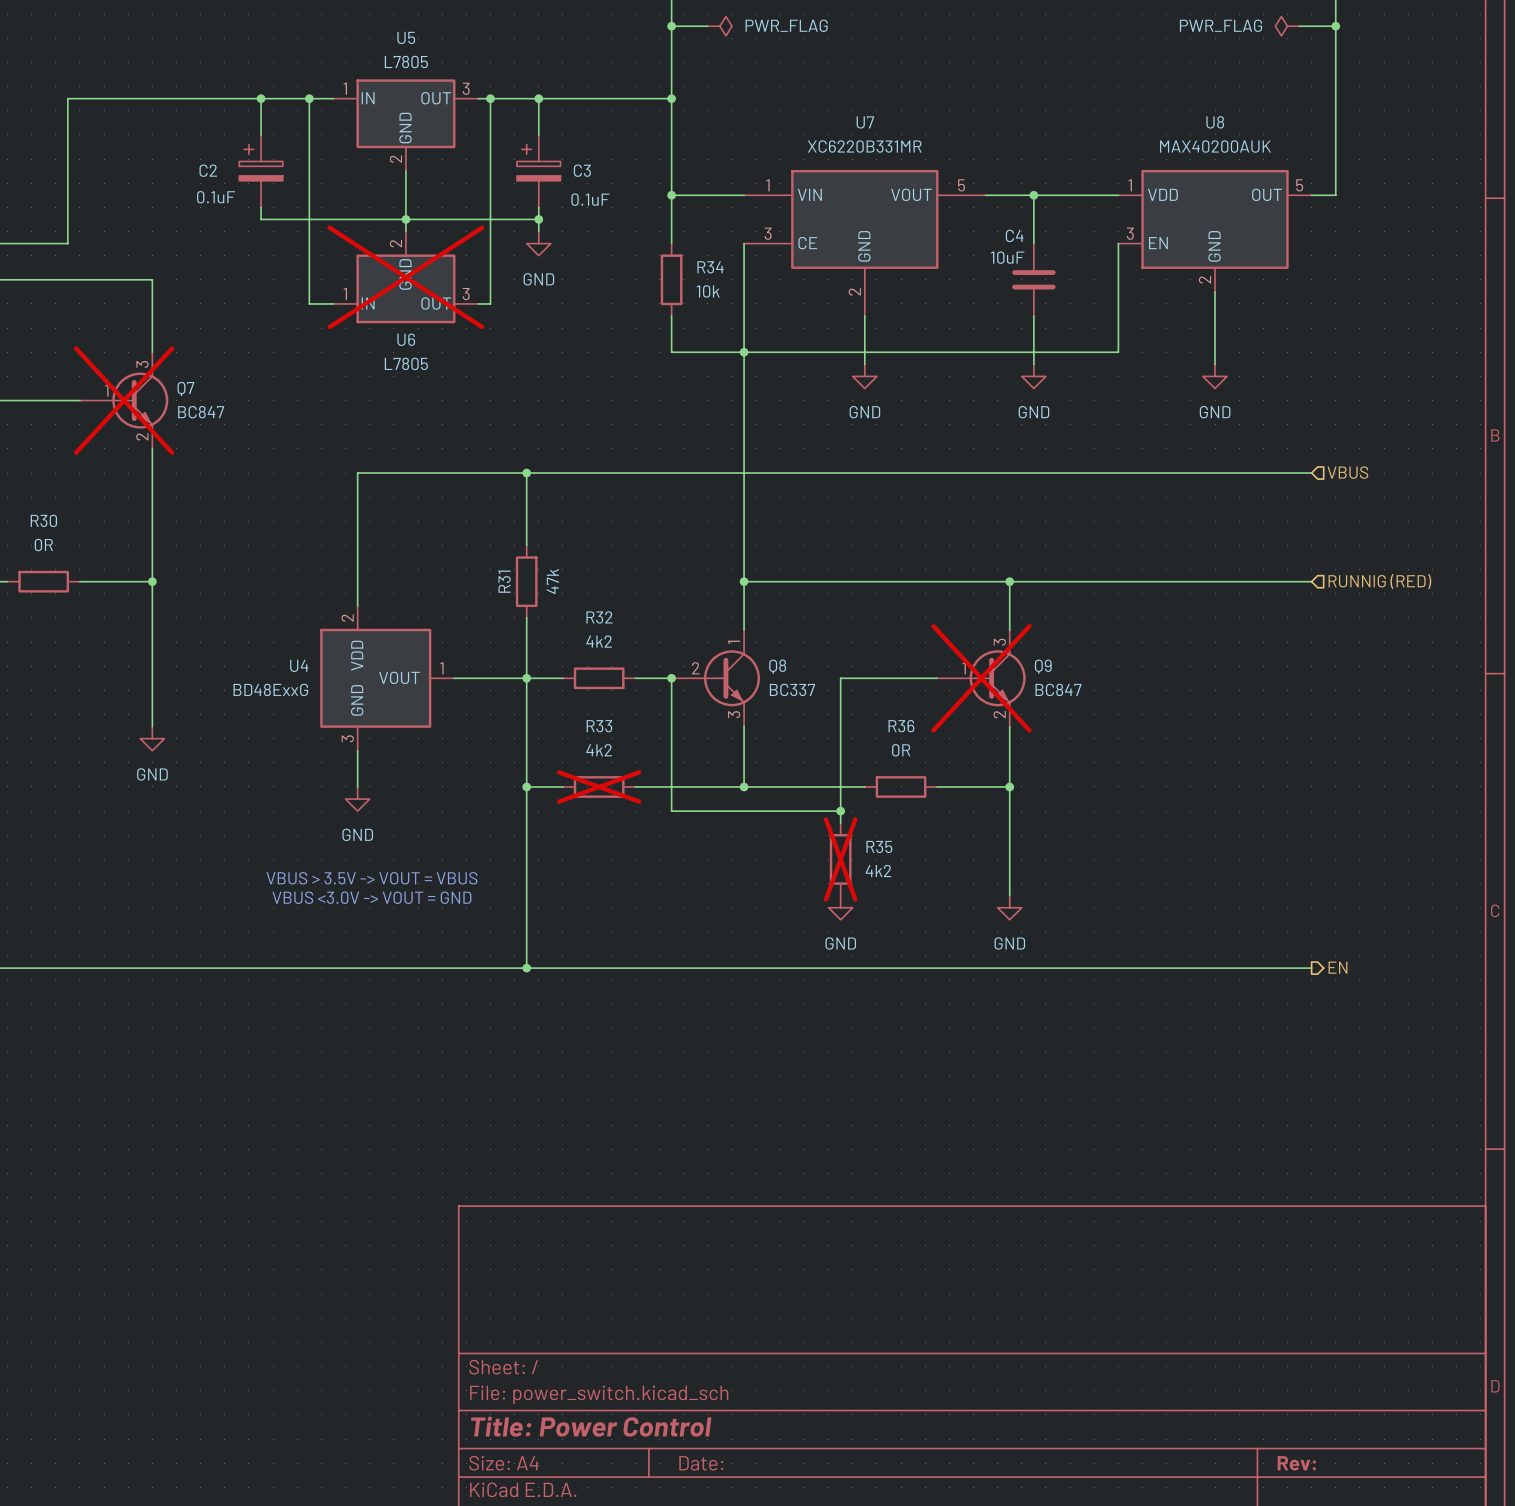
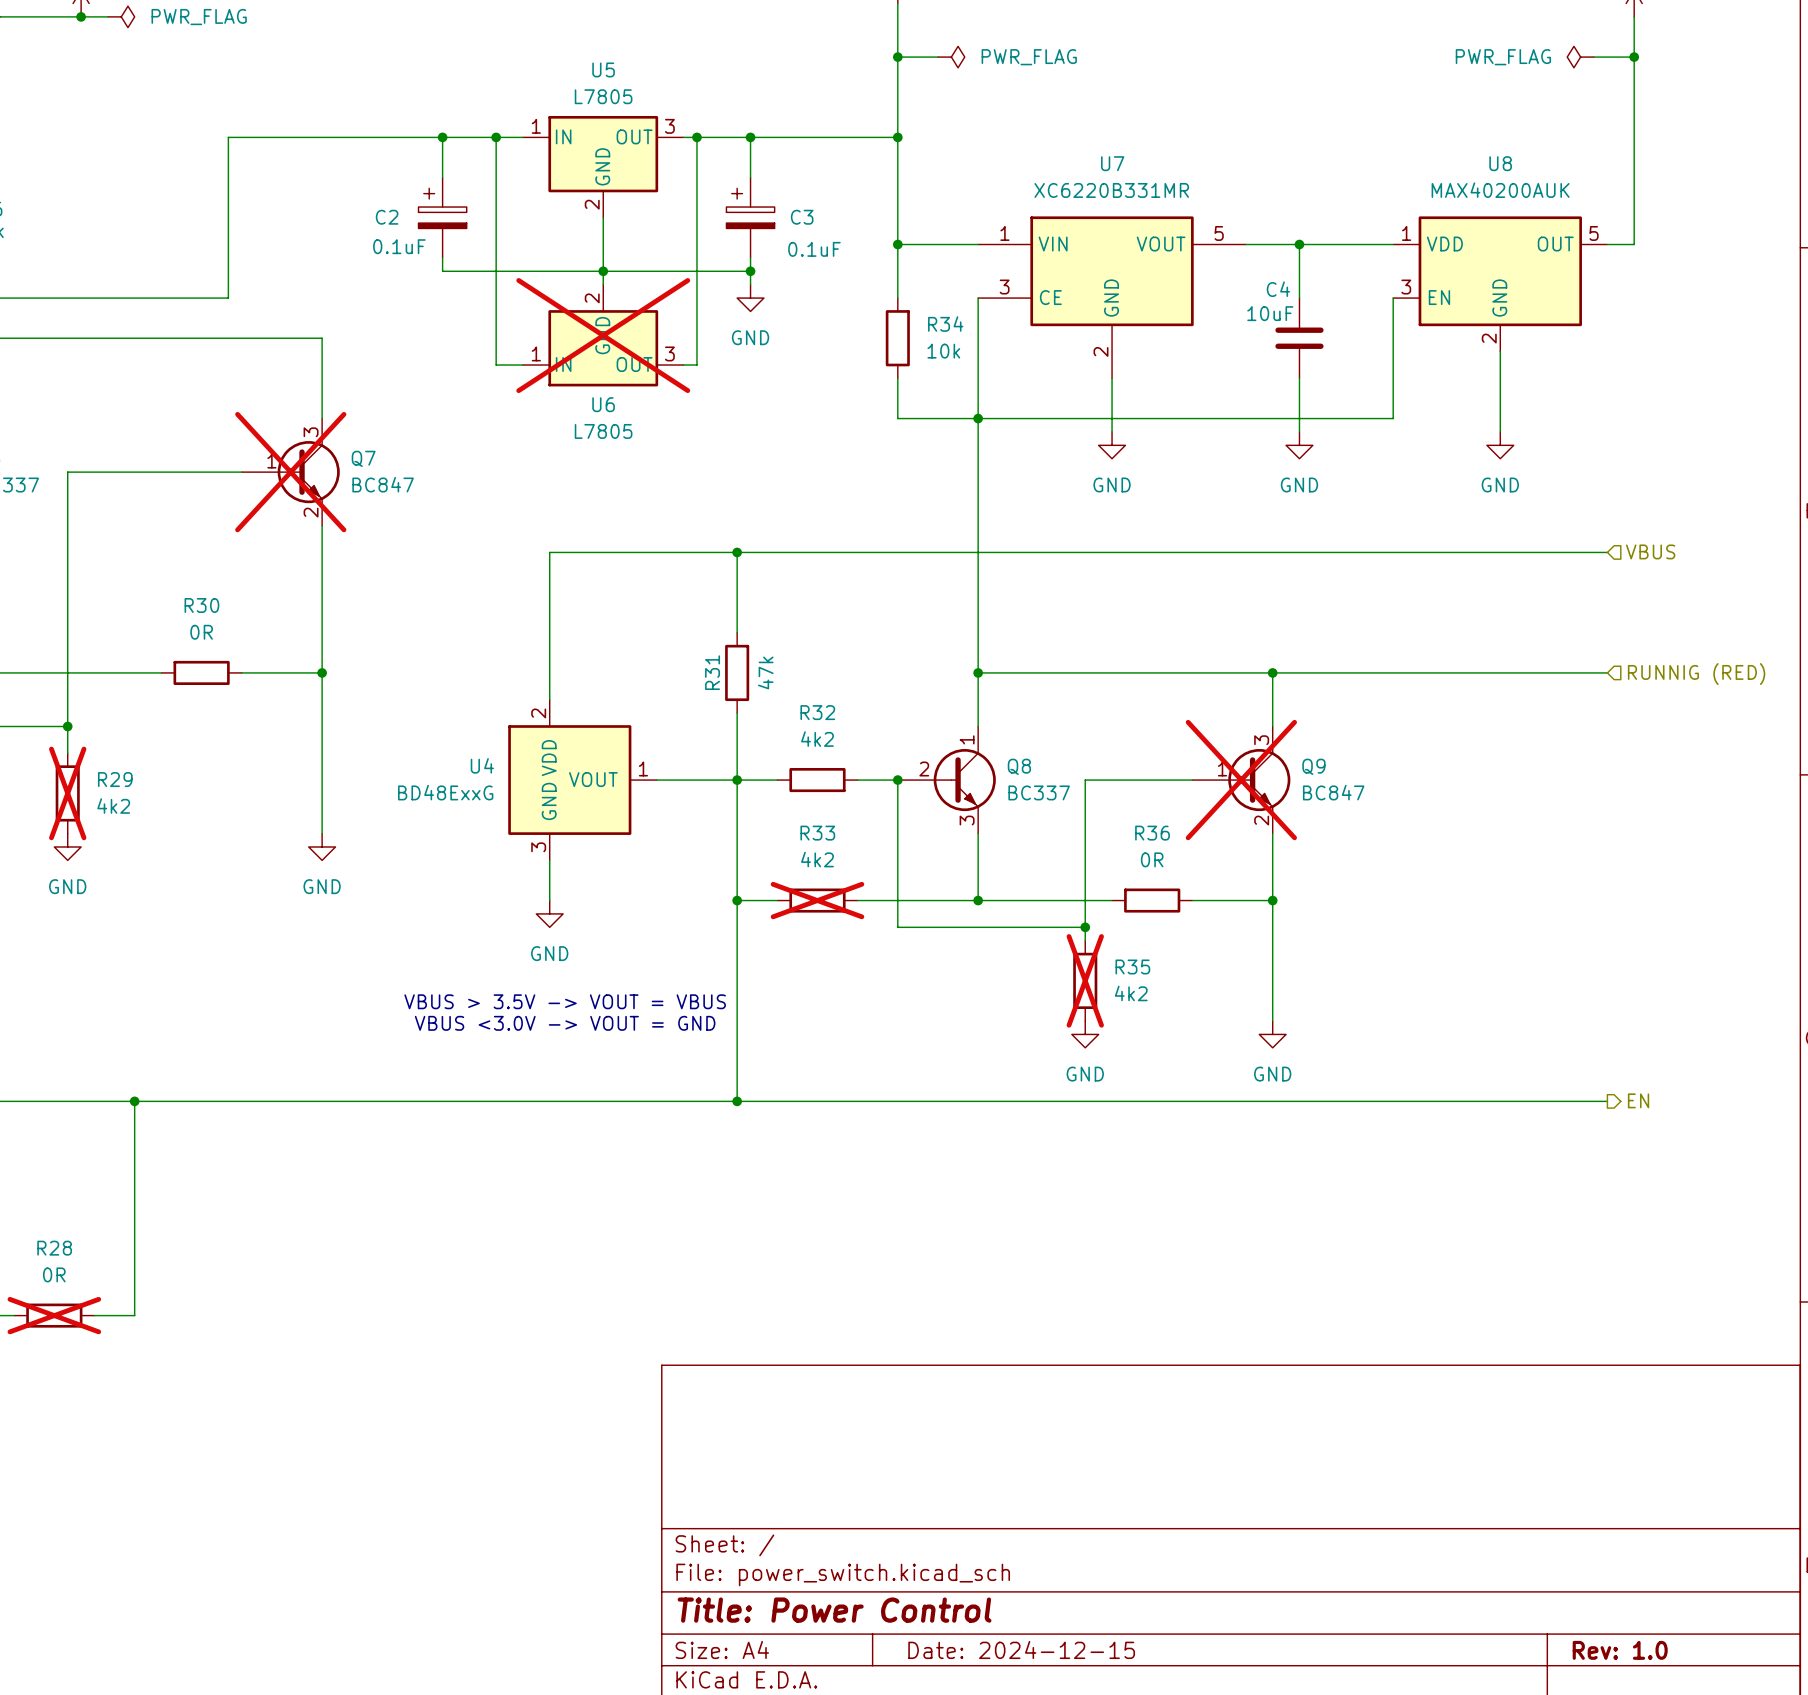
title block: Date: (701, 1463) -> Date: 2024-12-15 (1021, 1649)
title block: Rev: (1296, 1463) -> Rev: 1.0 (1620, 1650)

